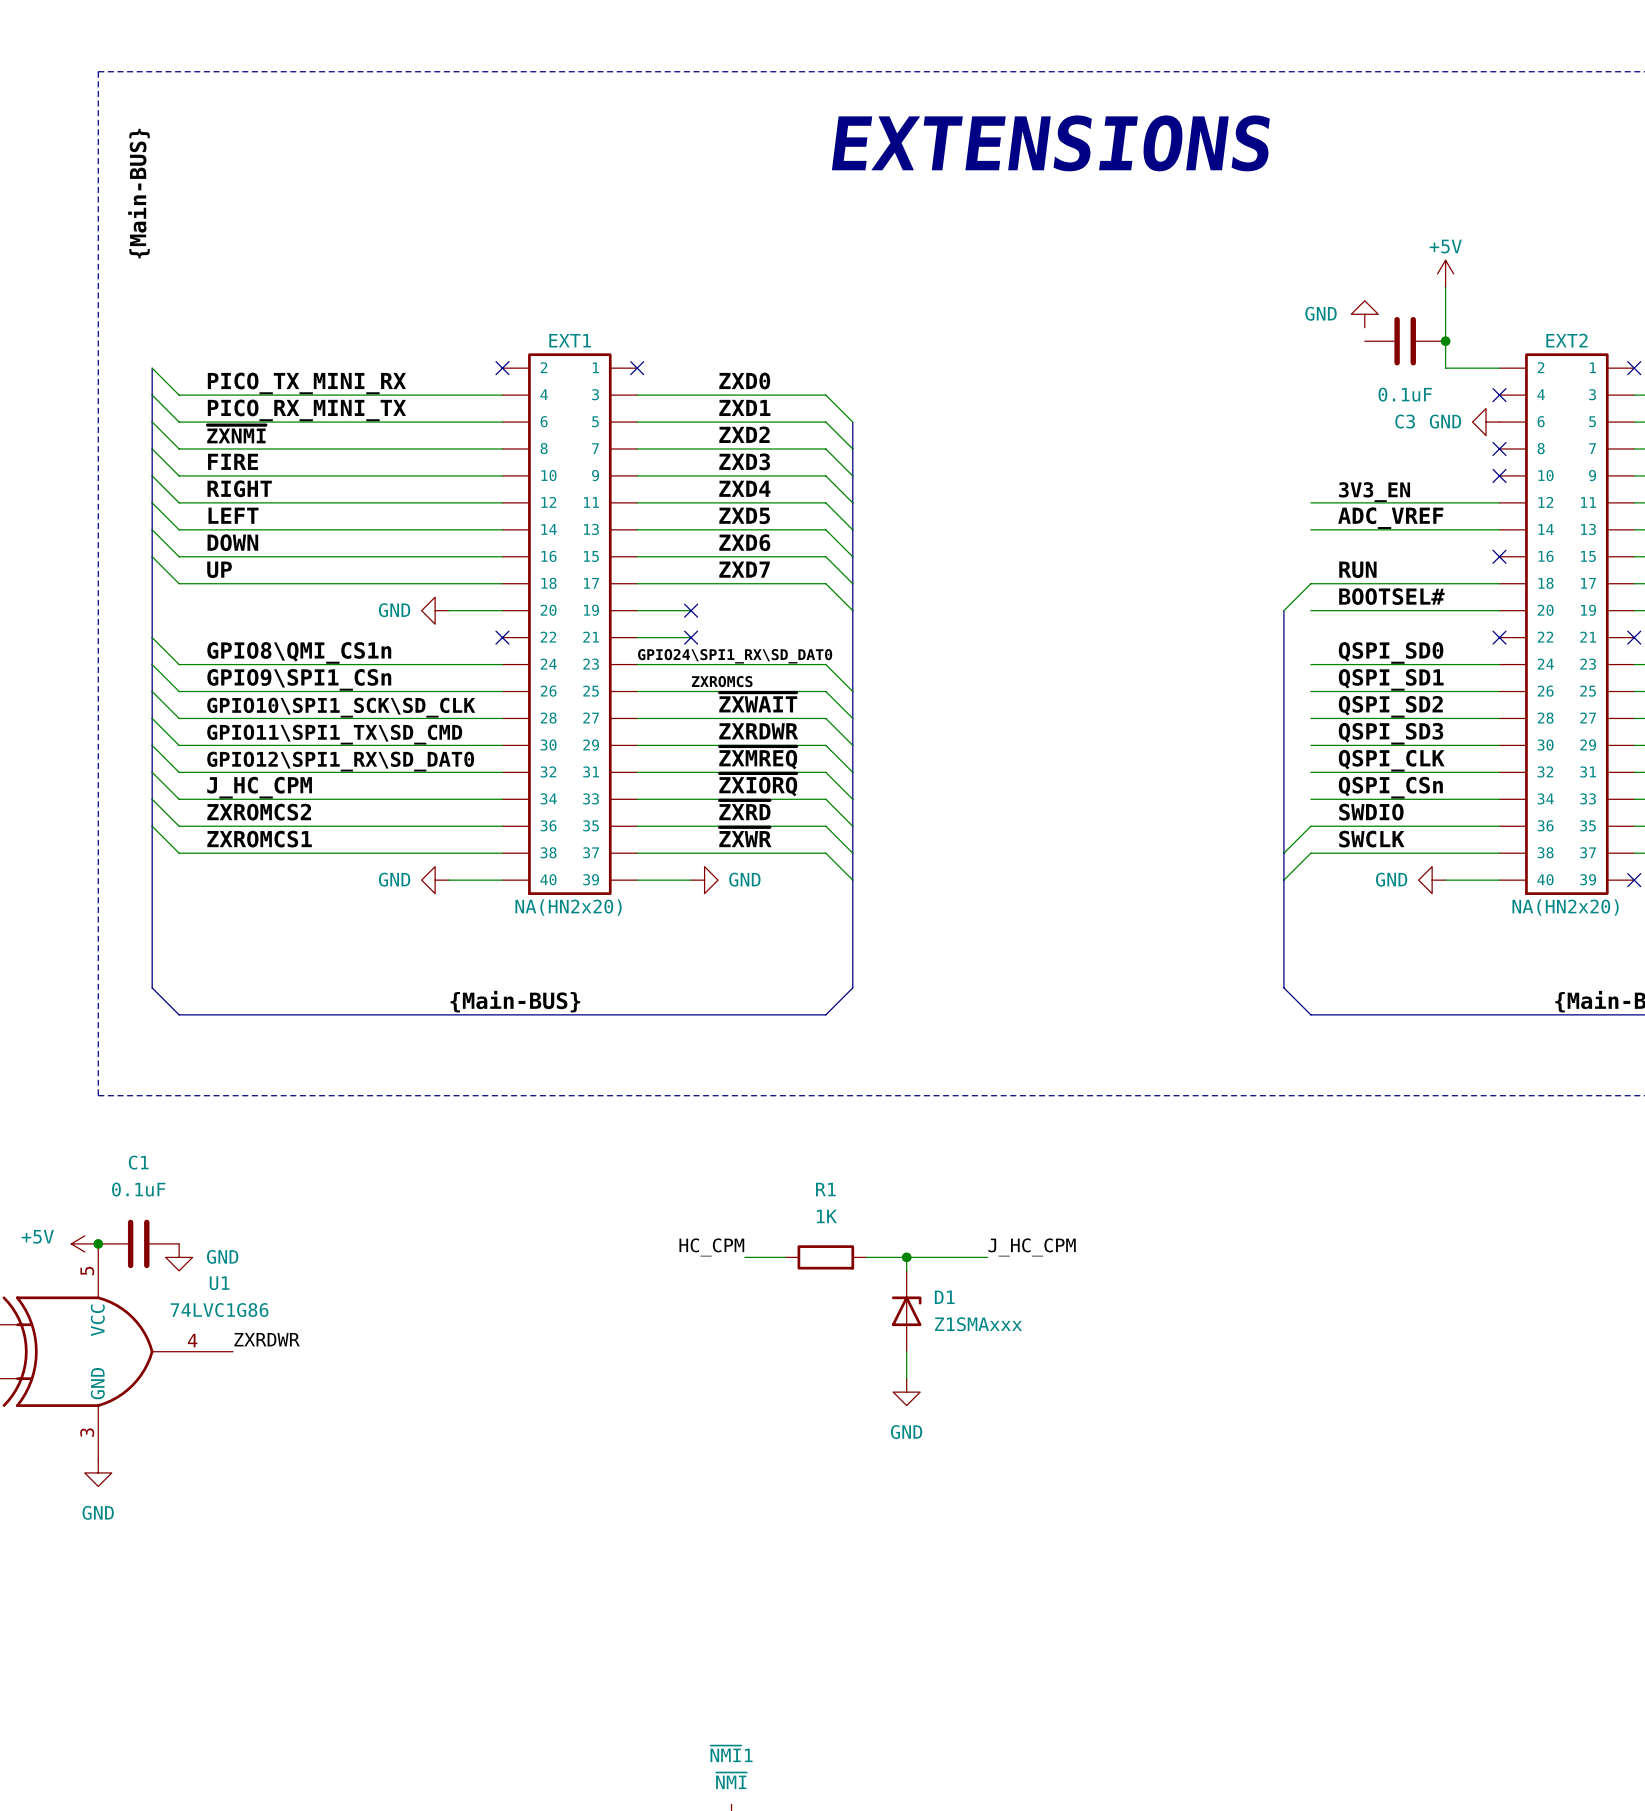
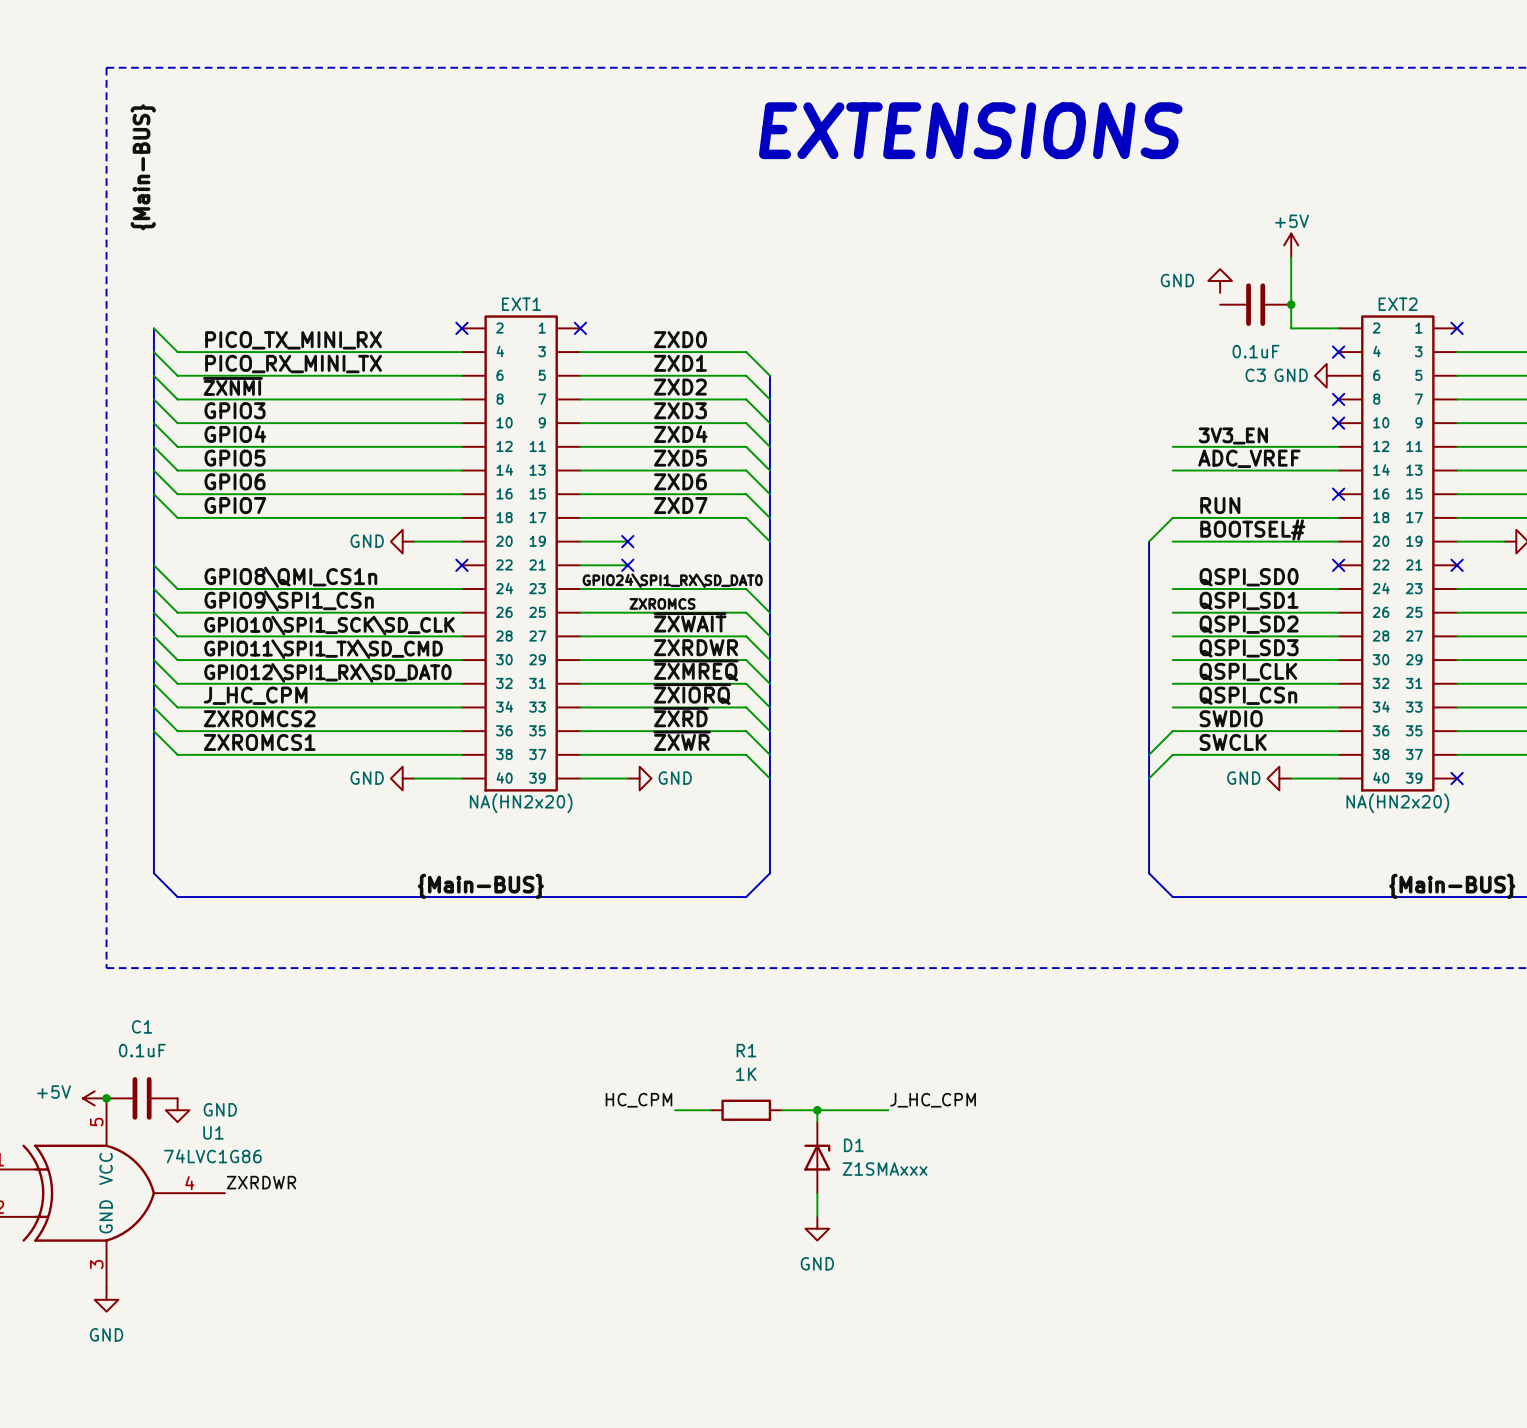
label: FIRE (233, 461) -> GPIO3 (235, 410)
label: RIGHT (239, 488) -> GPIO4 (235, 434)
label: LEFT (233, 515) -> GPIO5 (235, 458)
label: DOWN (232, 542) -> GPIO6 (235, 481)
label: UP (219, 569) -> GPIO7 (235, 505)

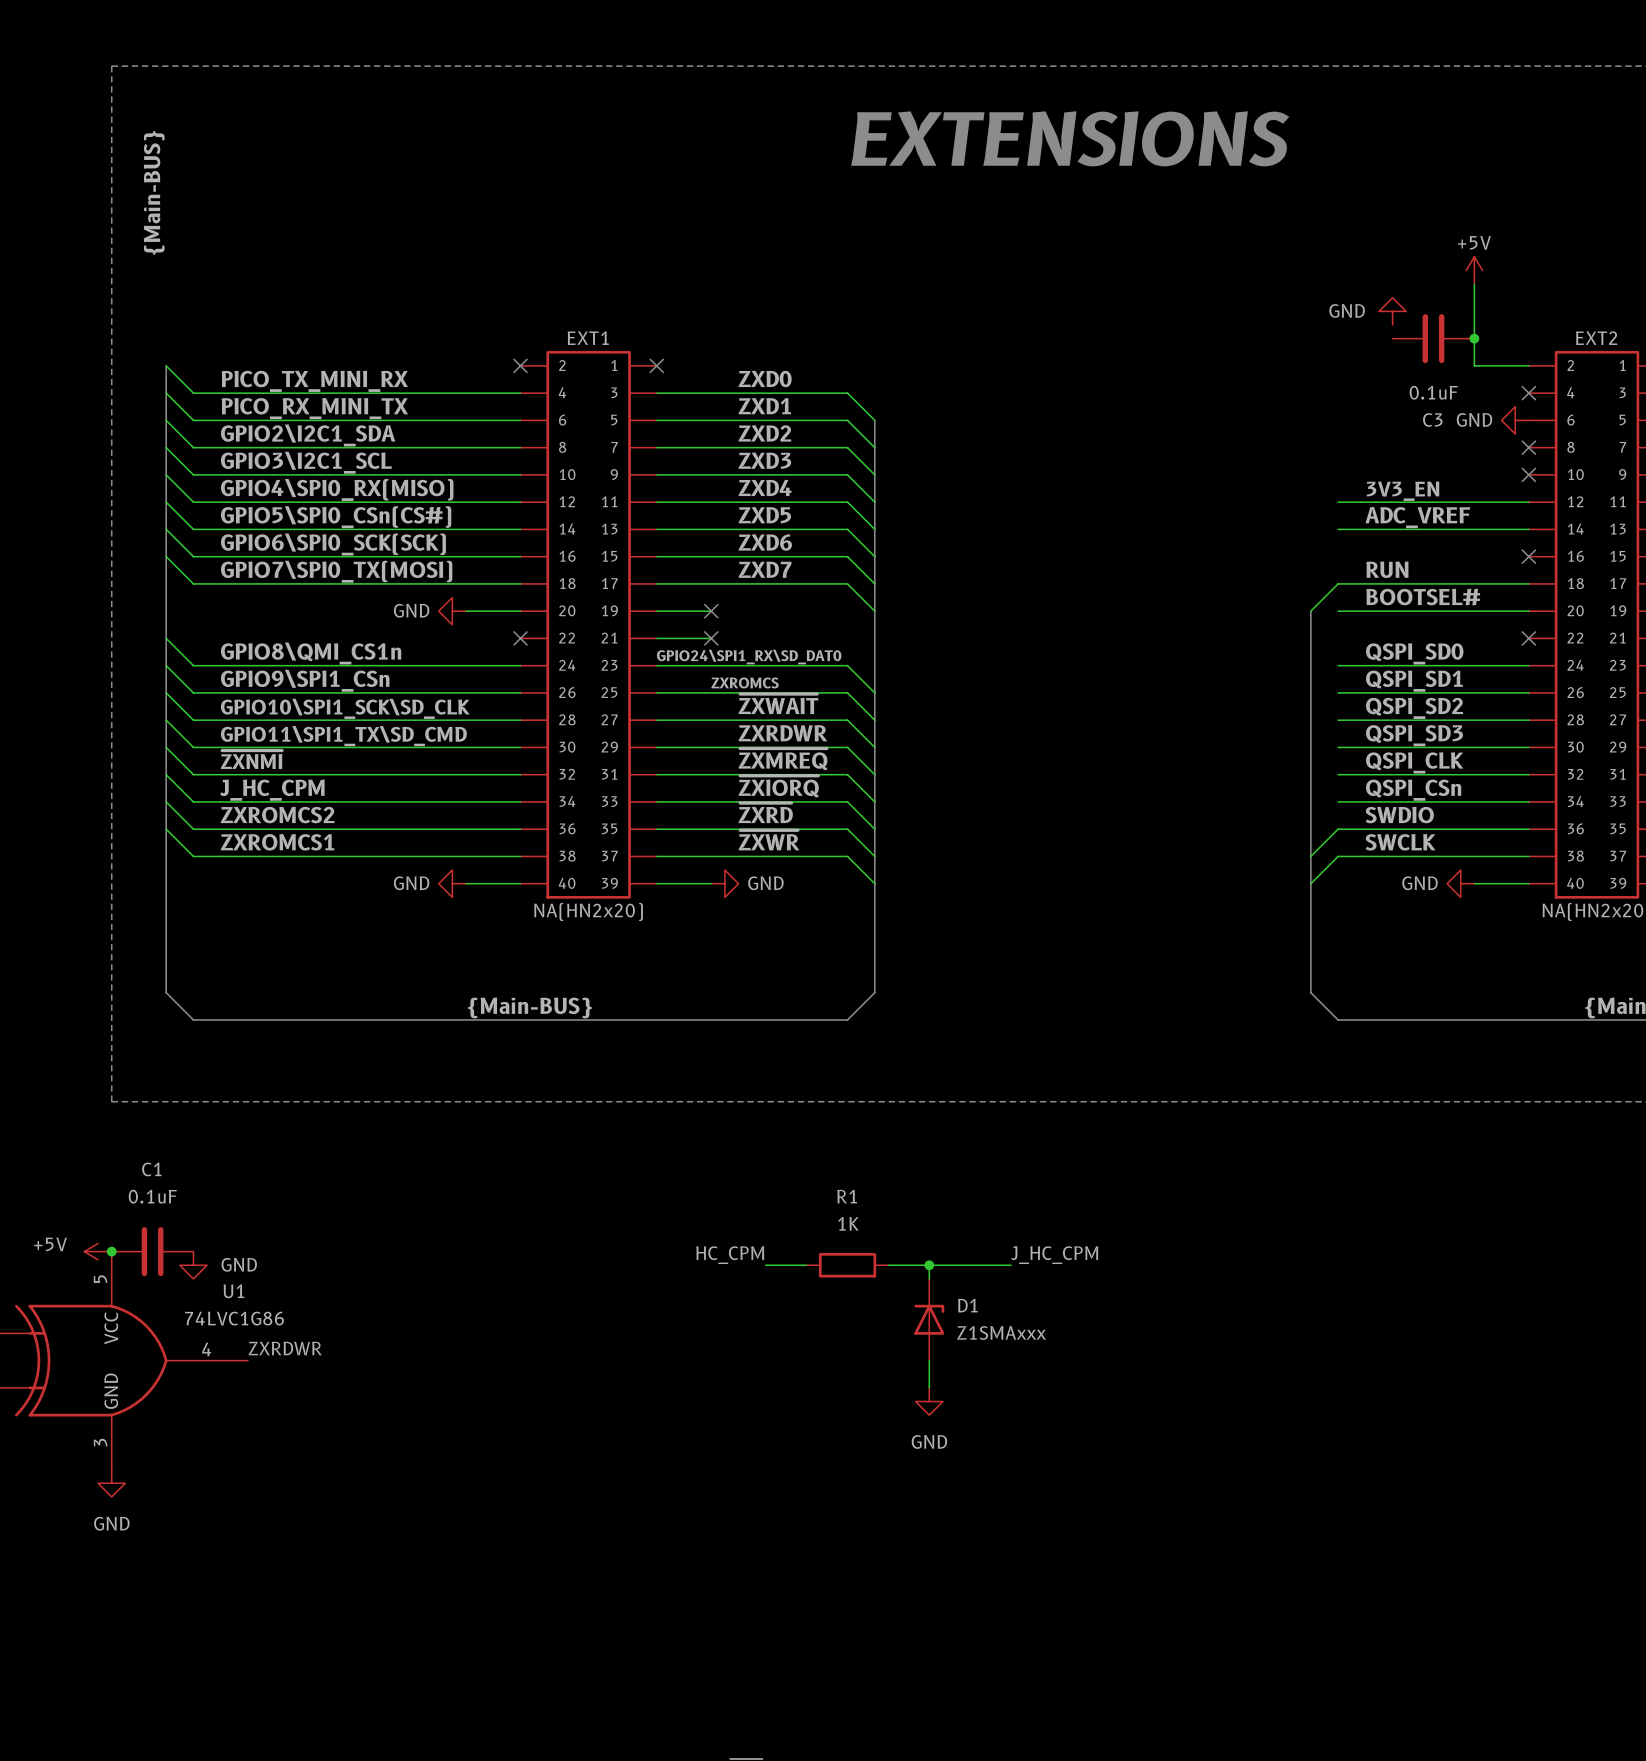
label: ~{ZXNMI} (232, 386) -> GPIO2\I2C1_SDA (308, 435)
label: GPIO3 (235, 410) -> GPIO3\I2C1_SCL (306, 462)
label: GPIO4 (235, 434) -> GPIO4\SPI0_RX(MISO) (337, 489)
label: GPIO5 (235, 458) -> GPIO5\SPI0_CSn(CS#) (336, 517)
label: GPIO6 (235, 481) -> GPIO6\SPI0_SCK(SCK) (333, 544)
label: GPIO7 (235, 505) -> GPIO7\SPI0_TX(MOSI) (336, 571)
label: GPIO12\SPI1_RX\SD_DAT0 (327, 672) -> ~{ZXNMI} (251, 759)

